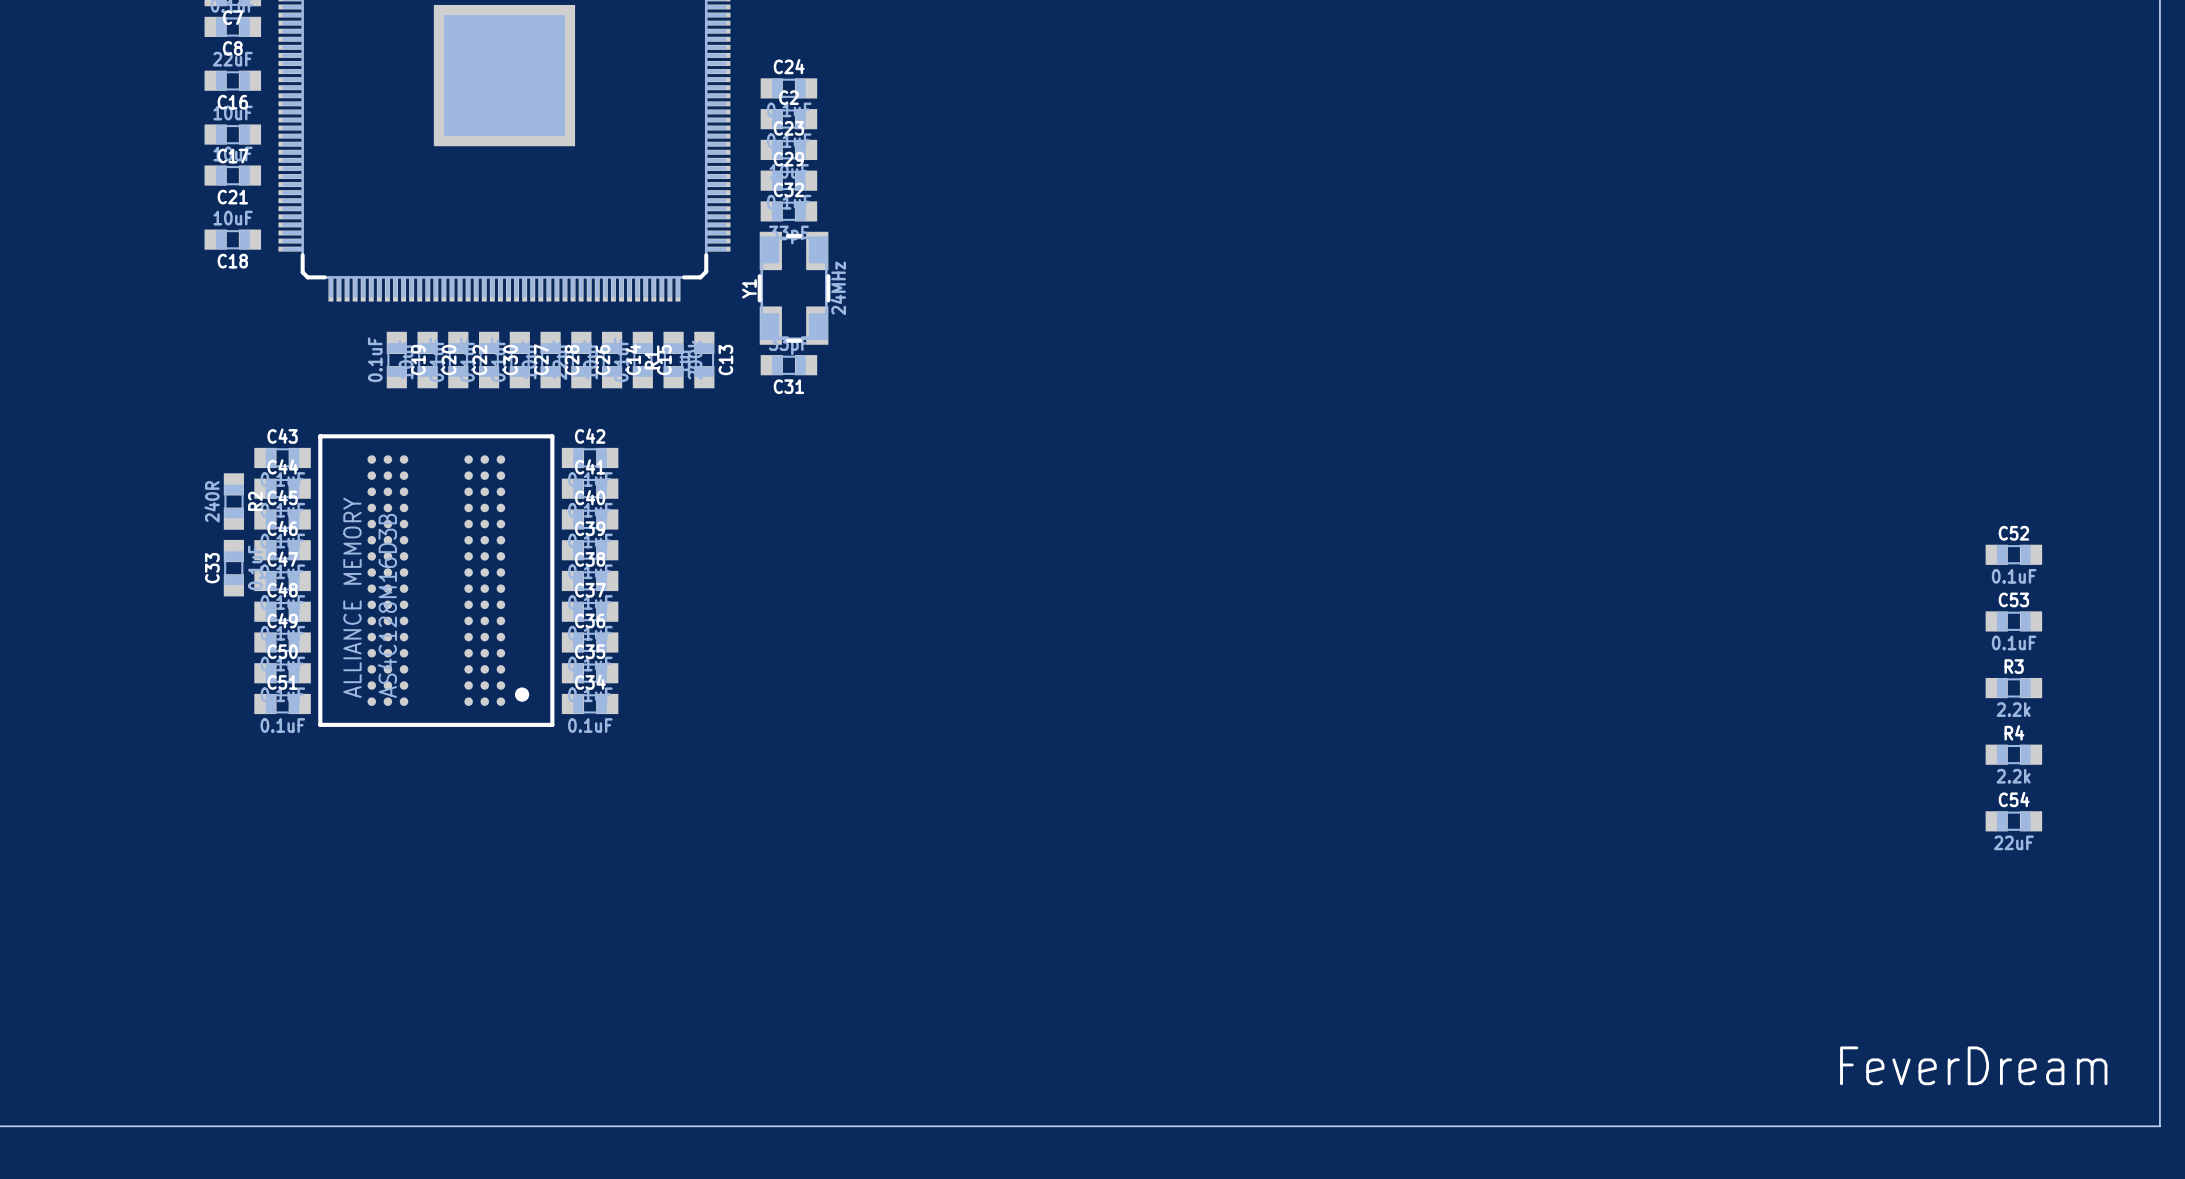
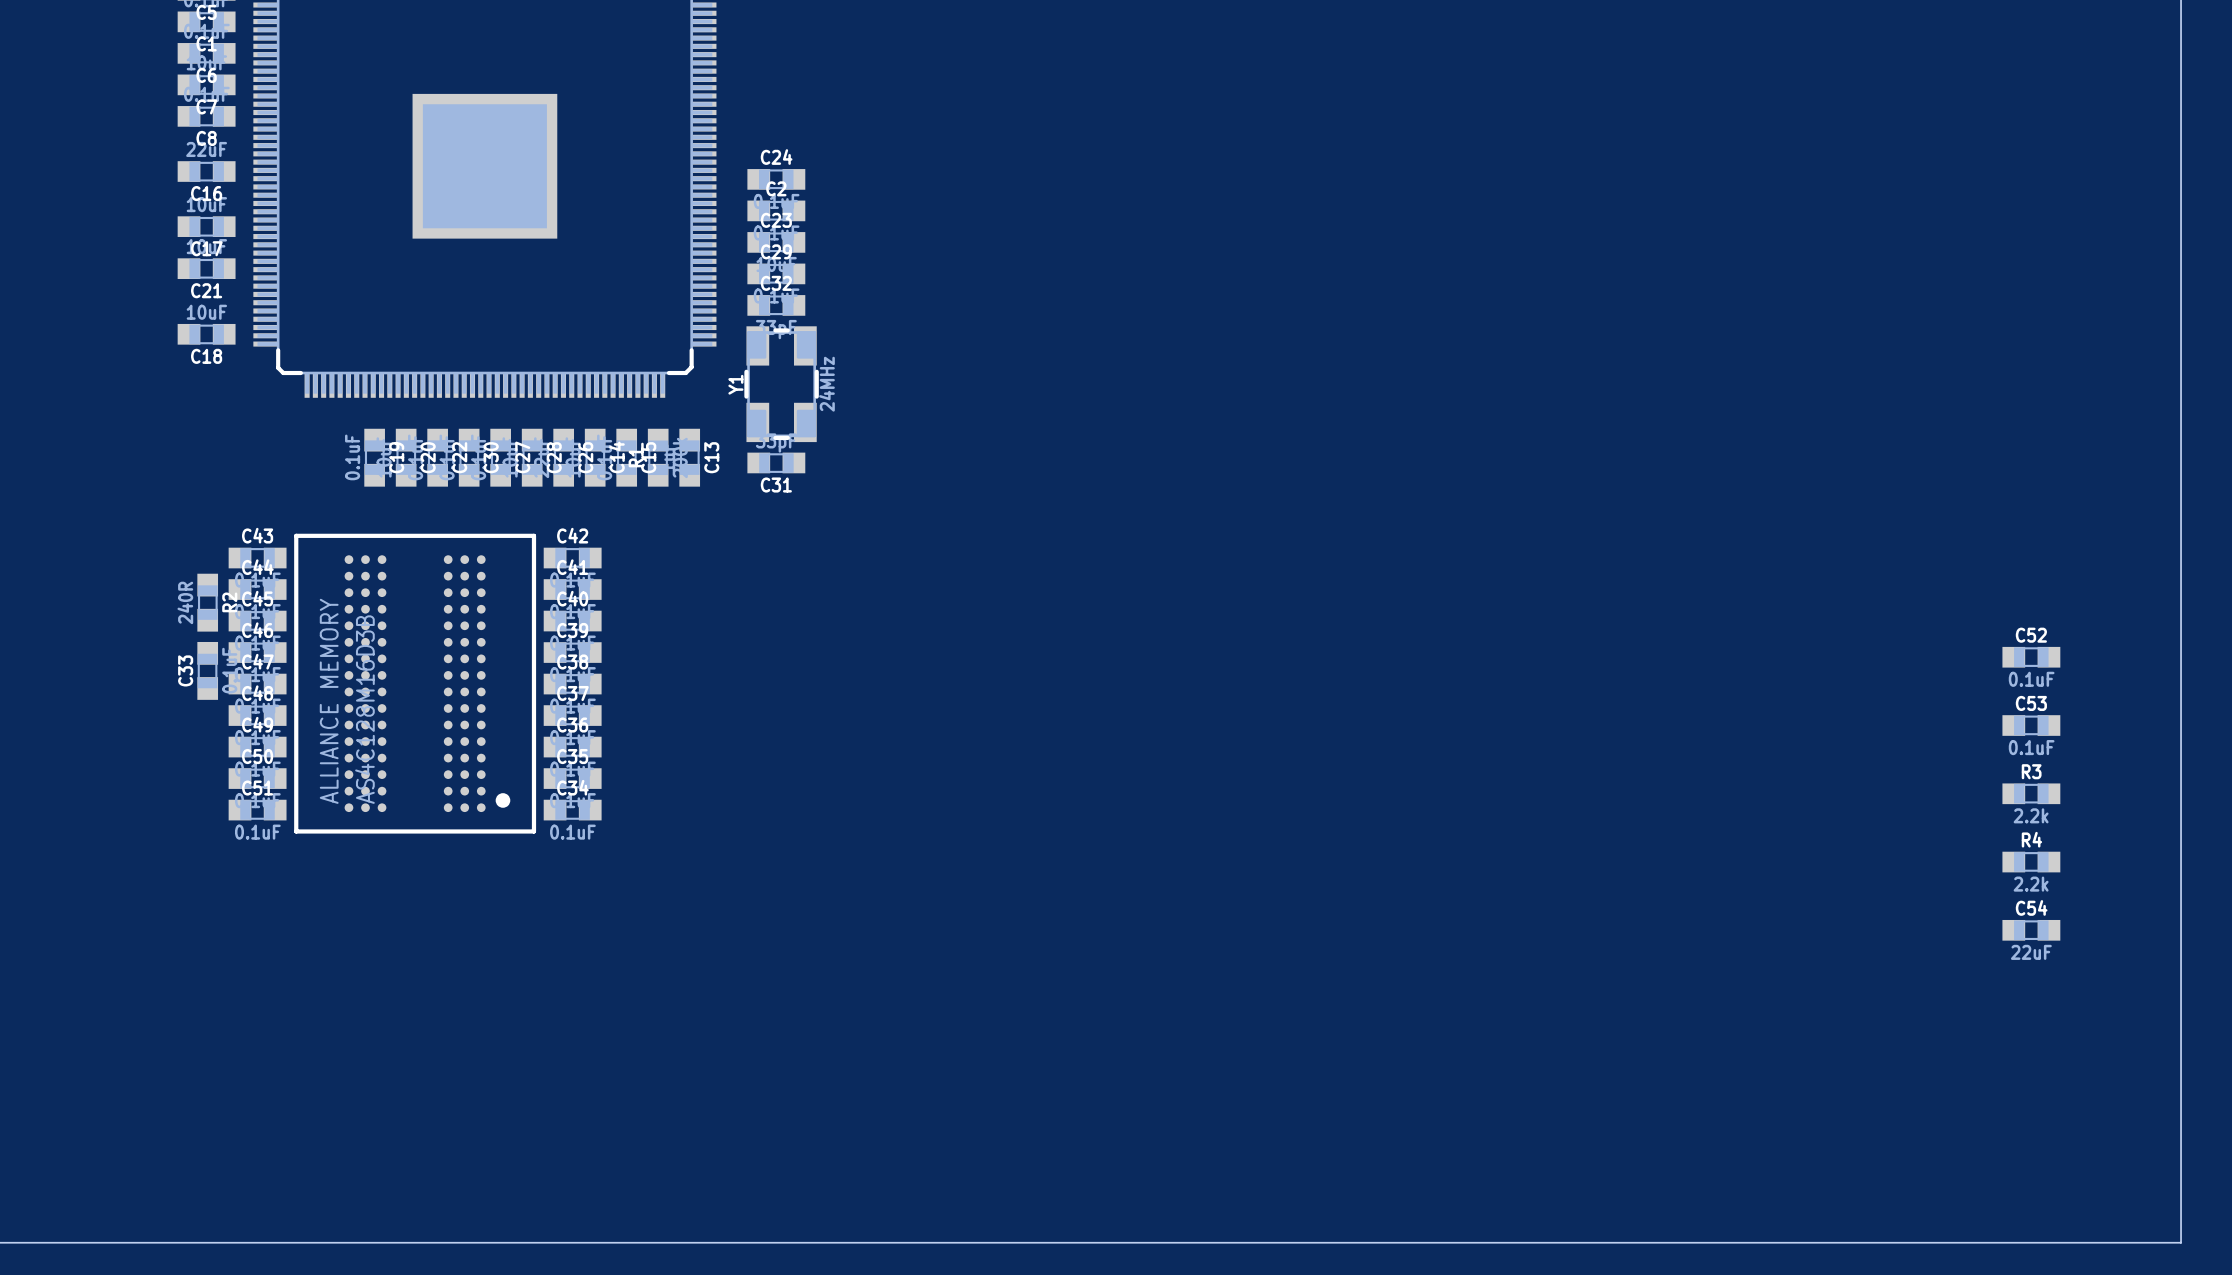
text: FeverDream (1973, 1065) -> none

